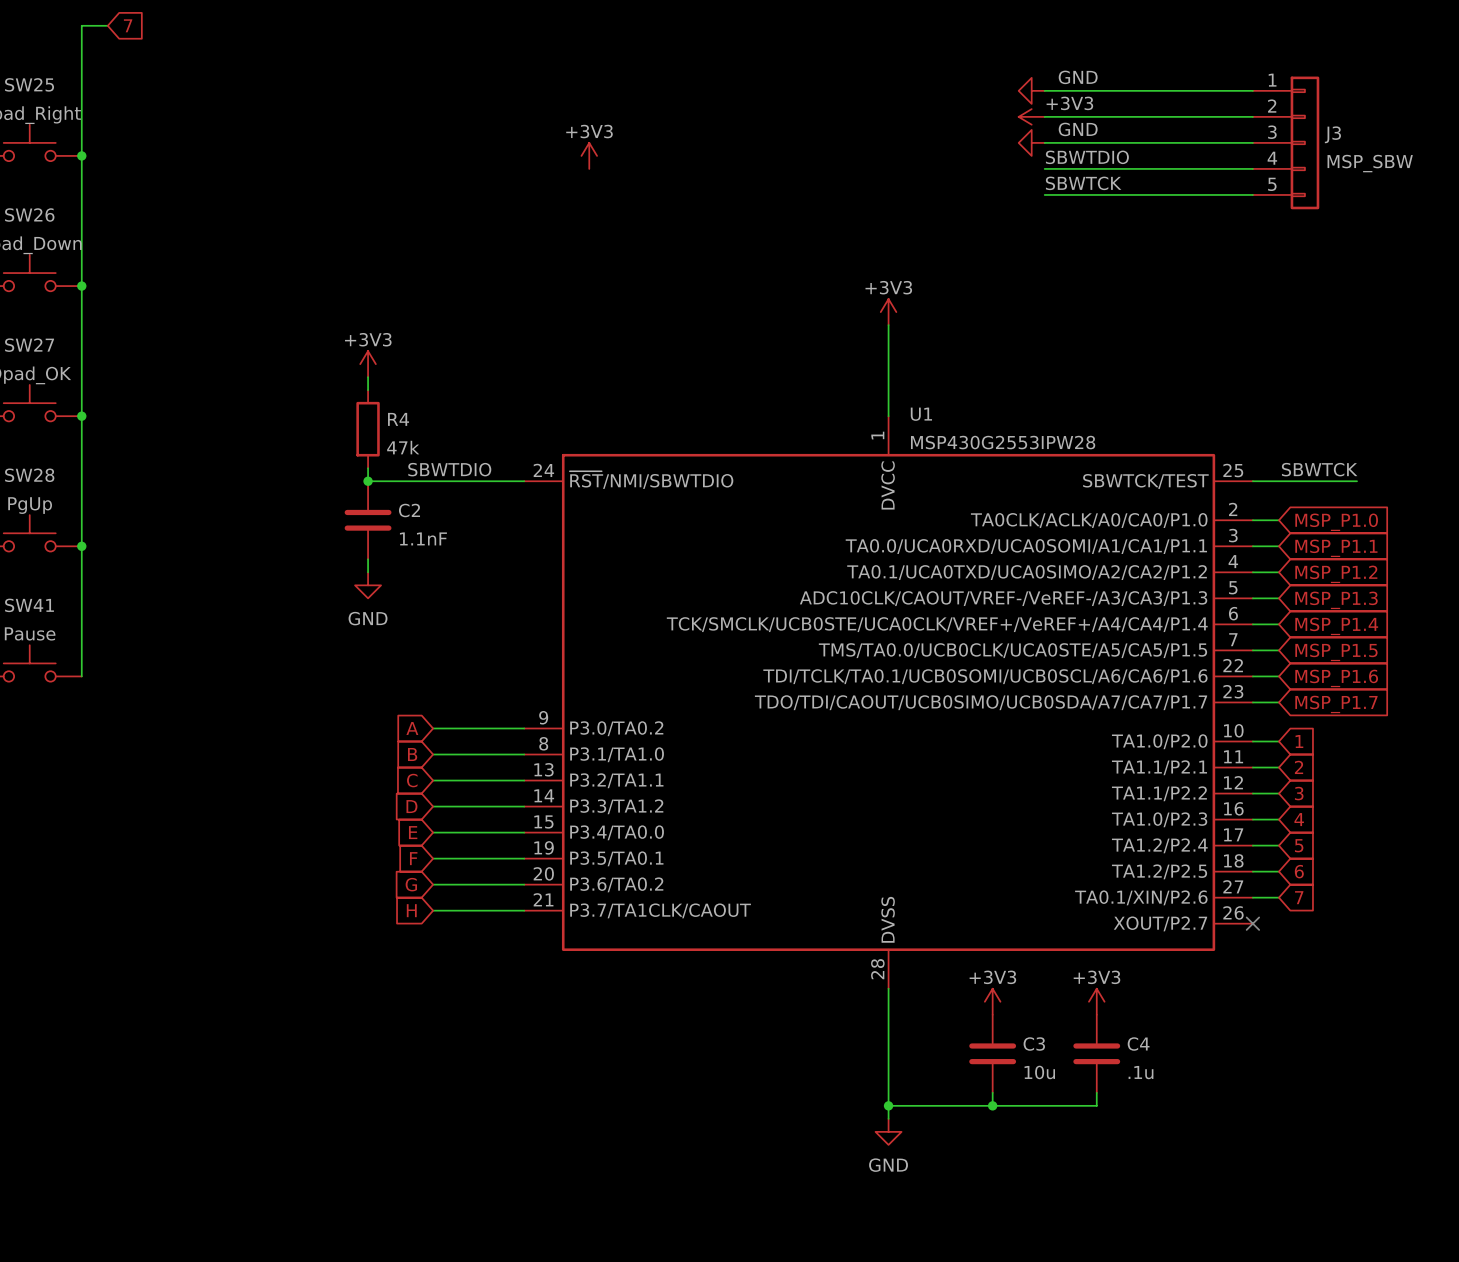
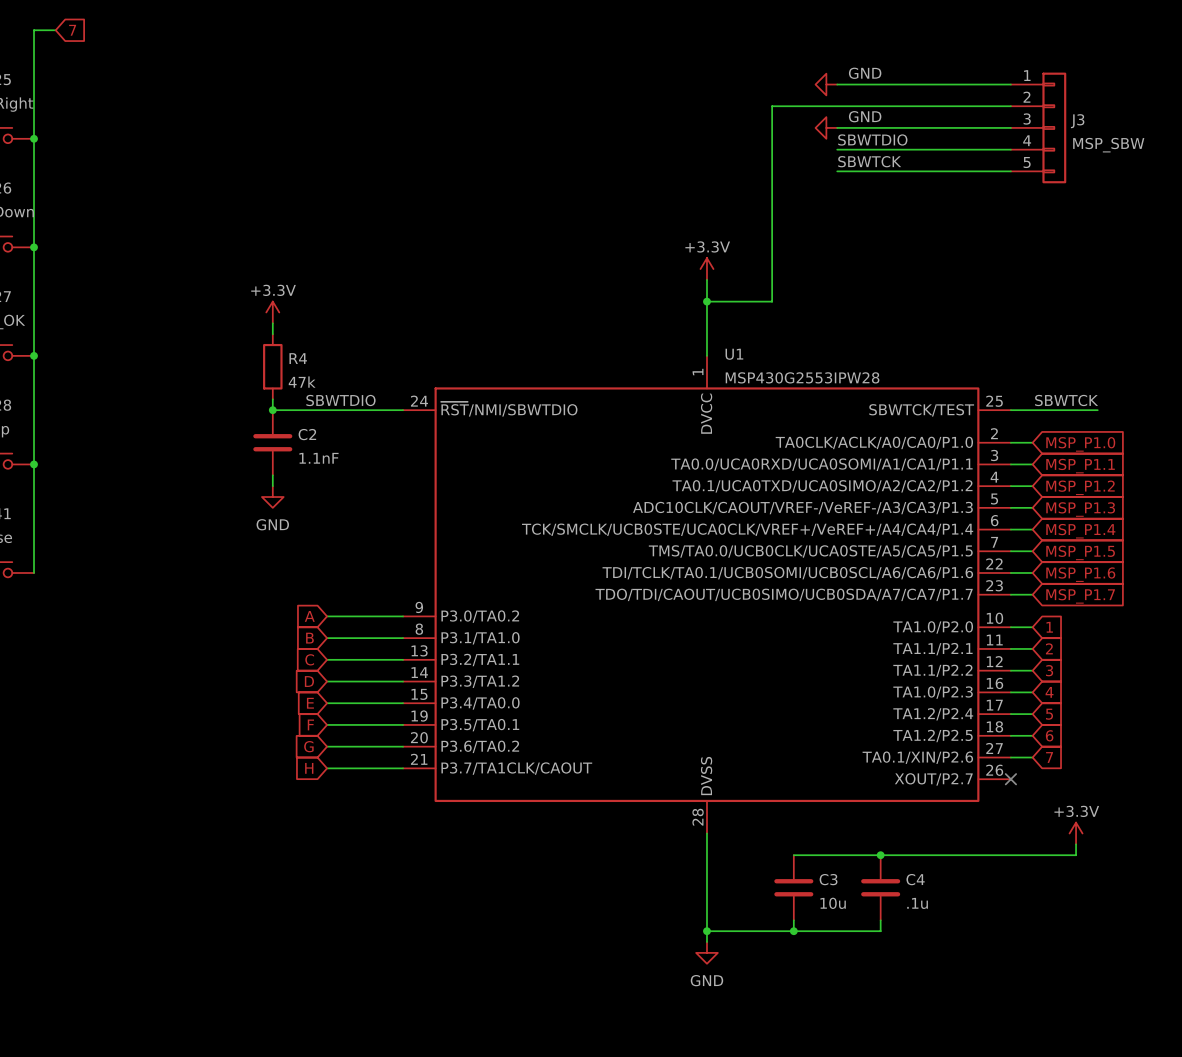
power symbol: +3V3 (1031, 116) -> none
wire: none -> (837, 106) (772, 106) (772, 301) (706, 301)
power symbol: +3V3 (589, 155) -> none
power symbol: +3V3 (888, 312) -> +3.3V (706, 269)
junction: none -> (706, 301)
power symbol: +3V3 (368, 364) -> +3.3V (272, 312)
power symbol: none -> +3.3V (1076, 833)
power symbol: +3V3 (992, 1001) -> none
power symbol: +3V3 (1096, 1001) -> none
wire: none -> (1076, 844) (1076, 855) (793, 855)
junction: none -> (880, 855)

